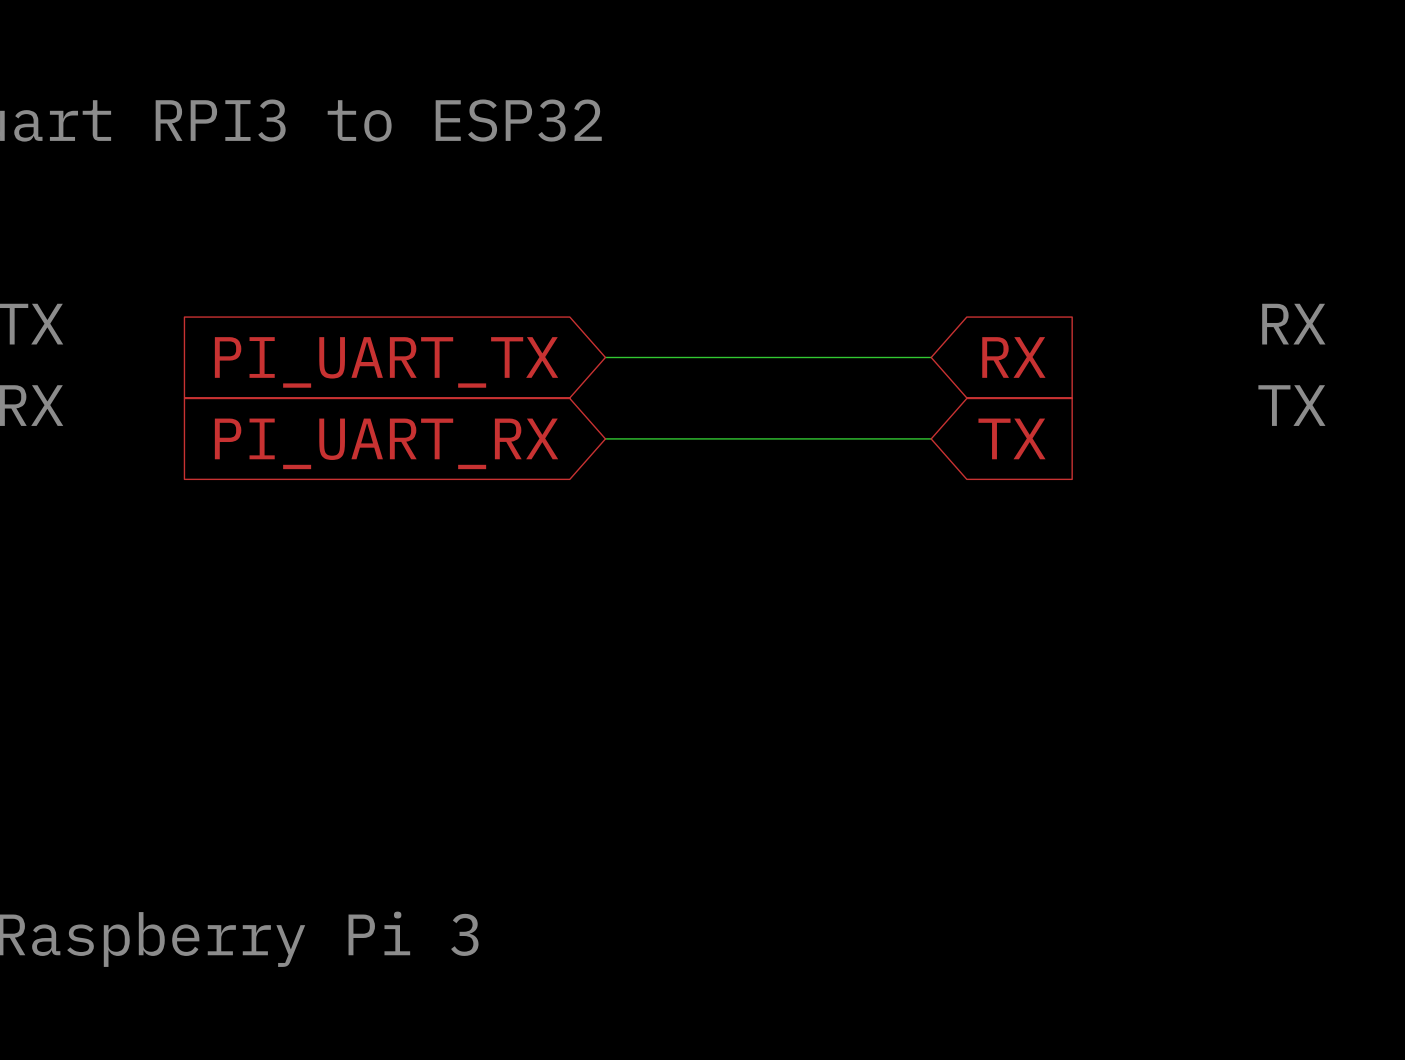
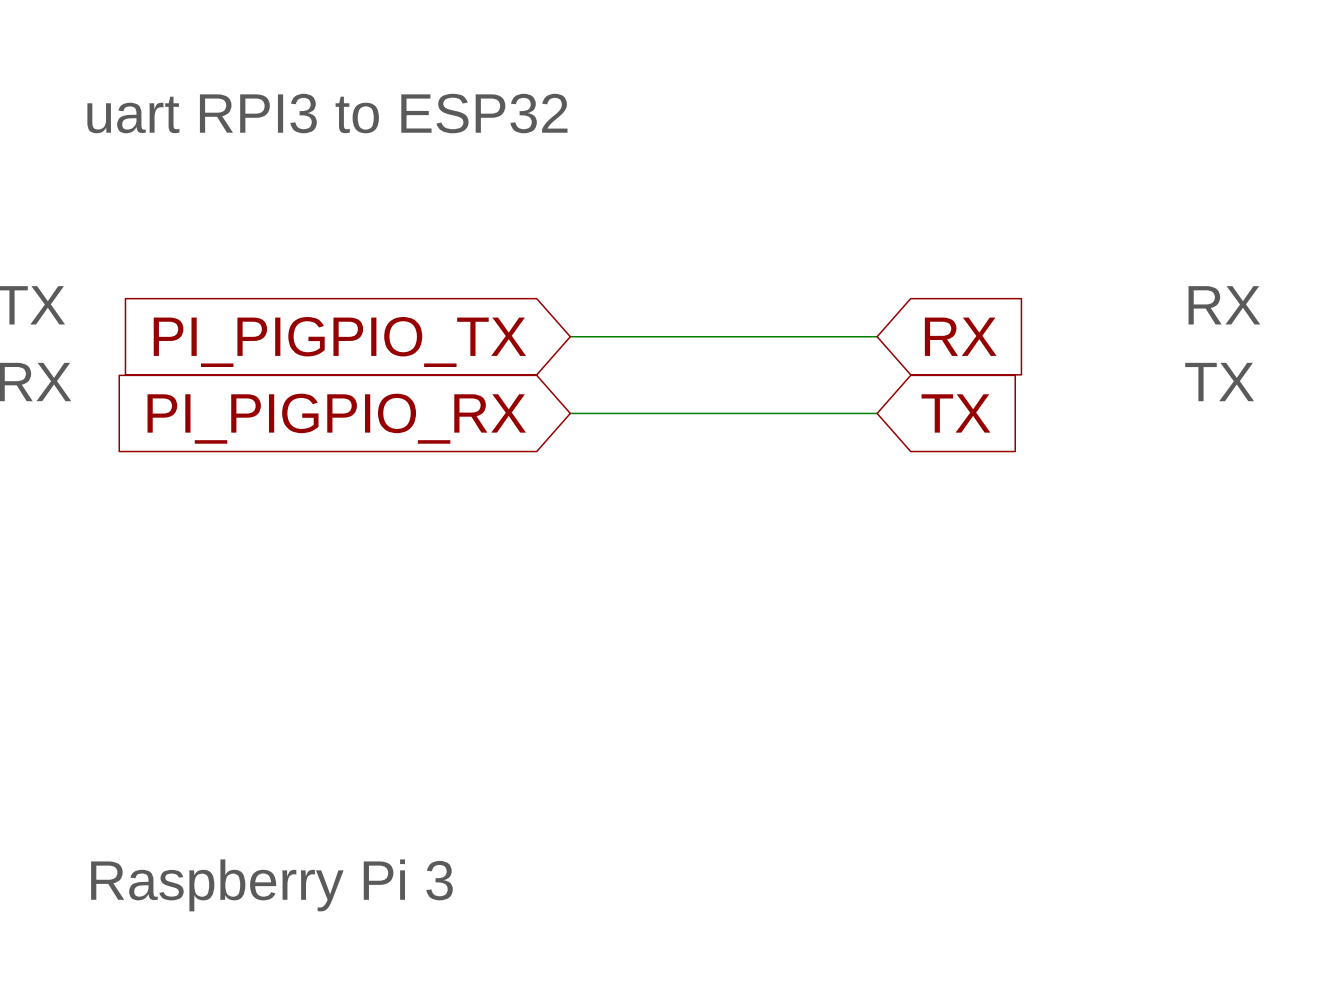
global label: PI_UART_TX (386, 362) -> PI_PIGPIO_TX (339, 341)
global label: PI_UART_RX (386, 443) -> PI_PIGPIO_RX (336, 418)

